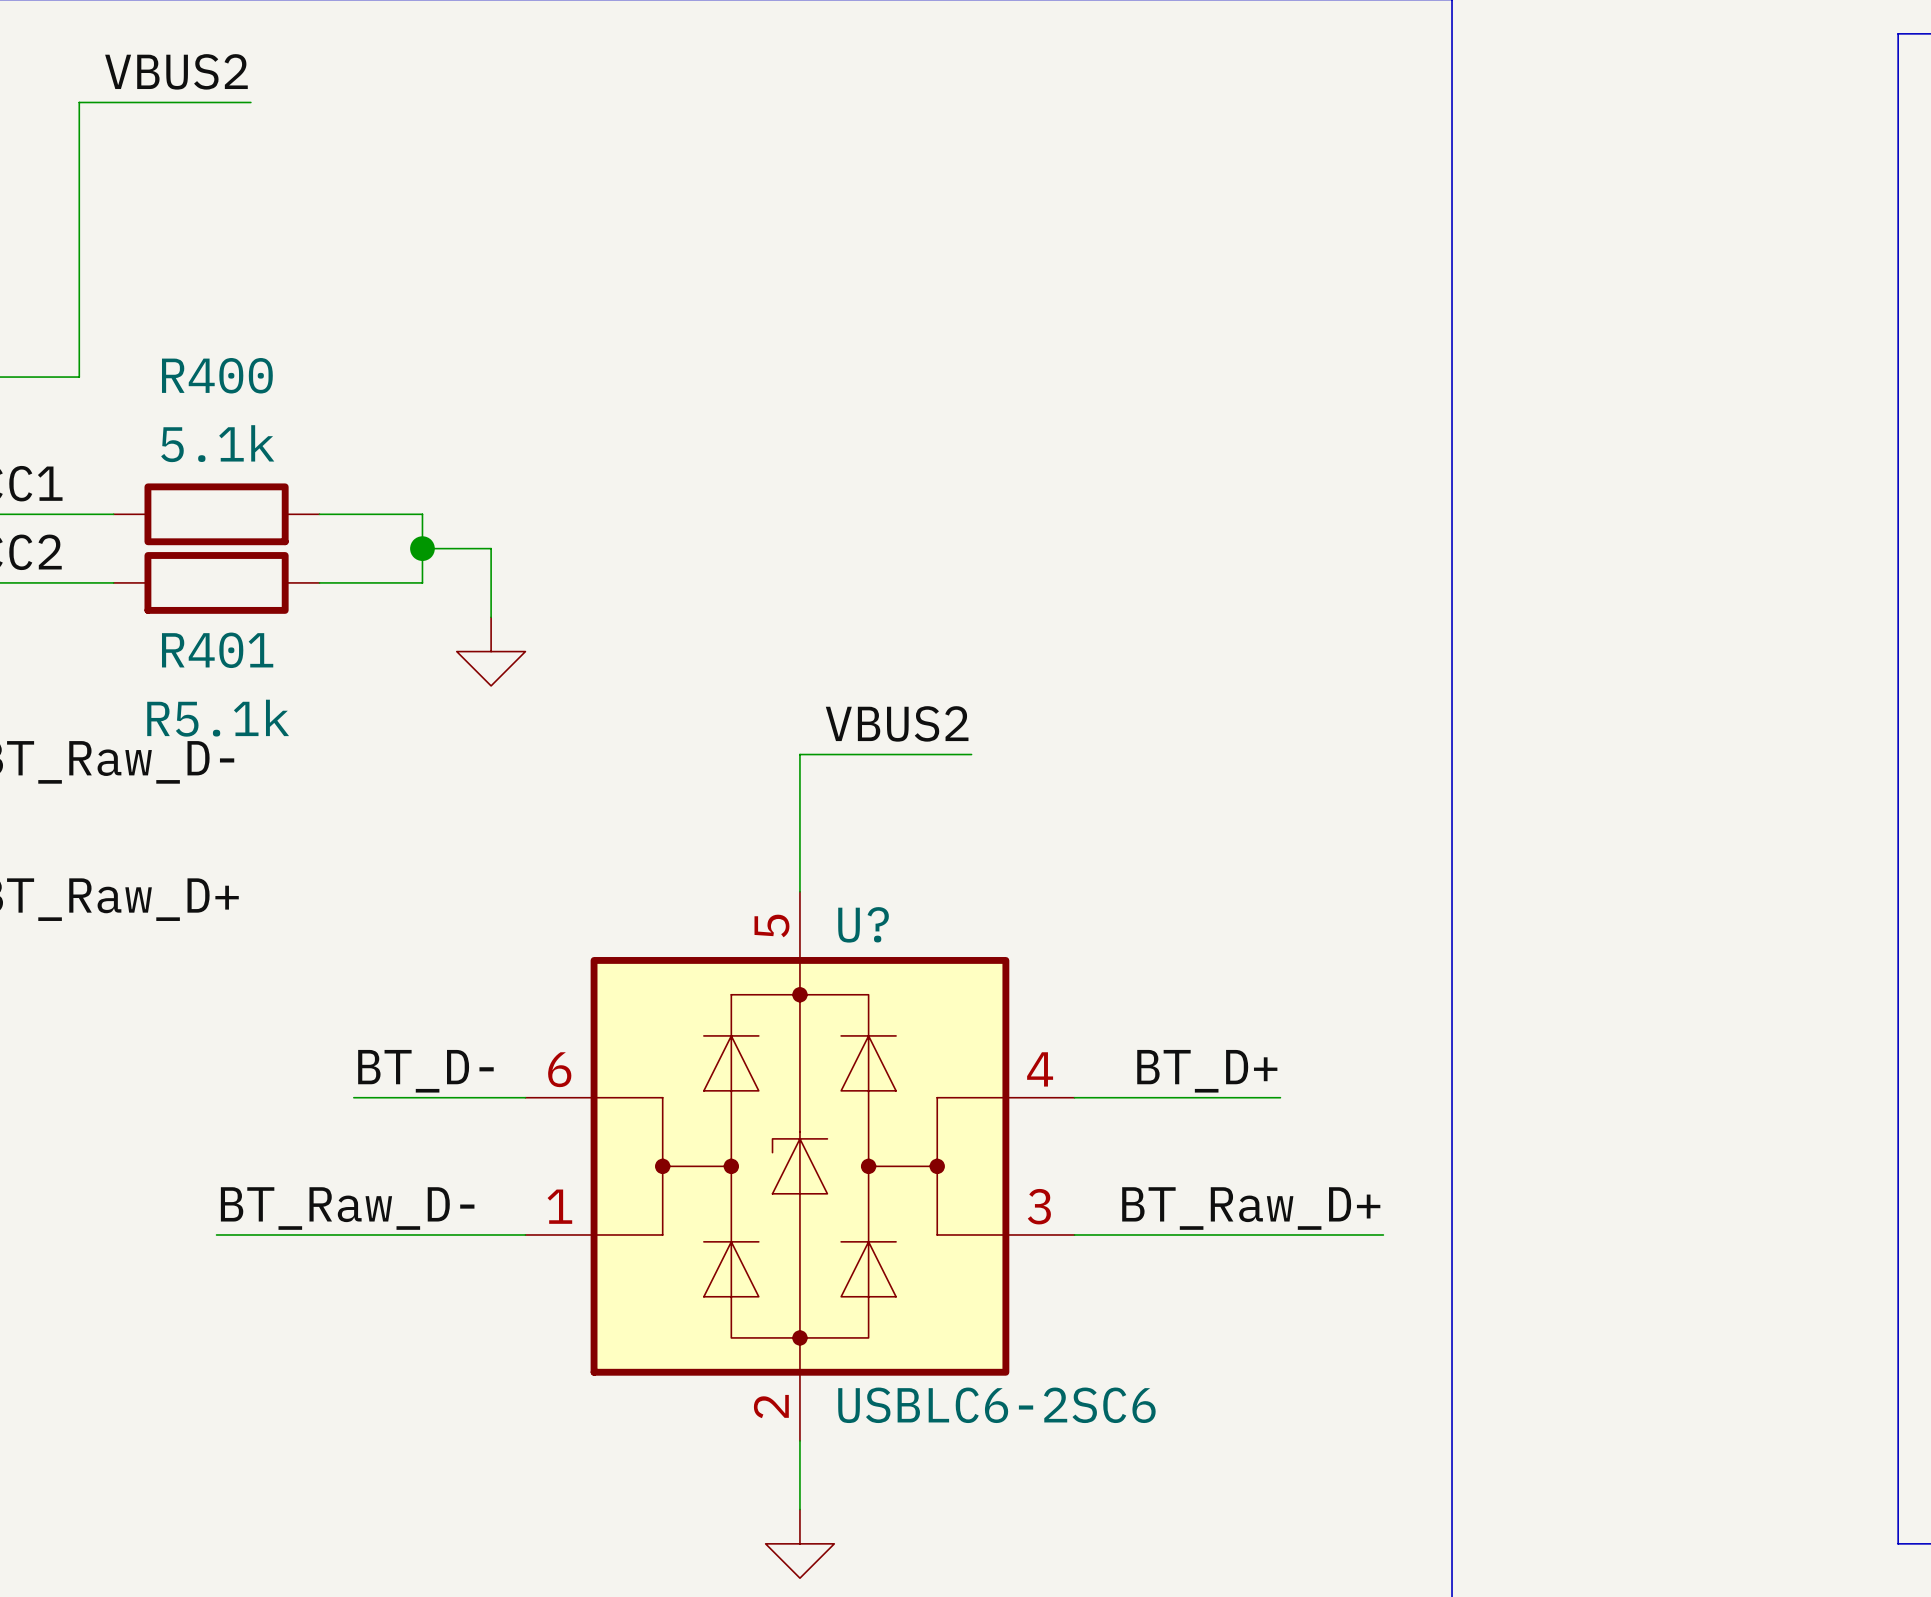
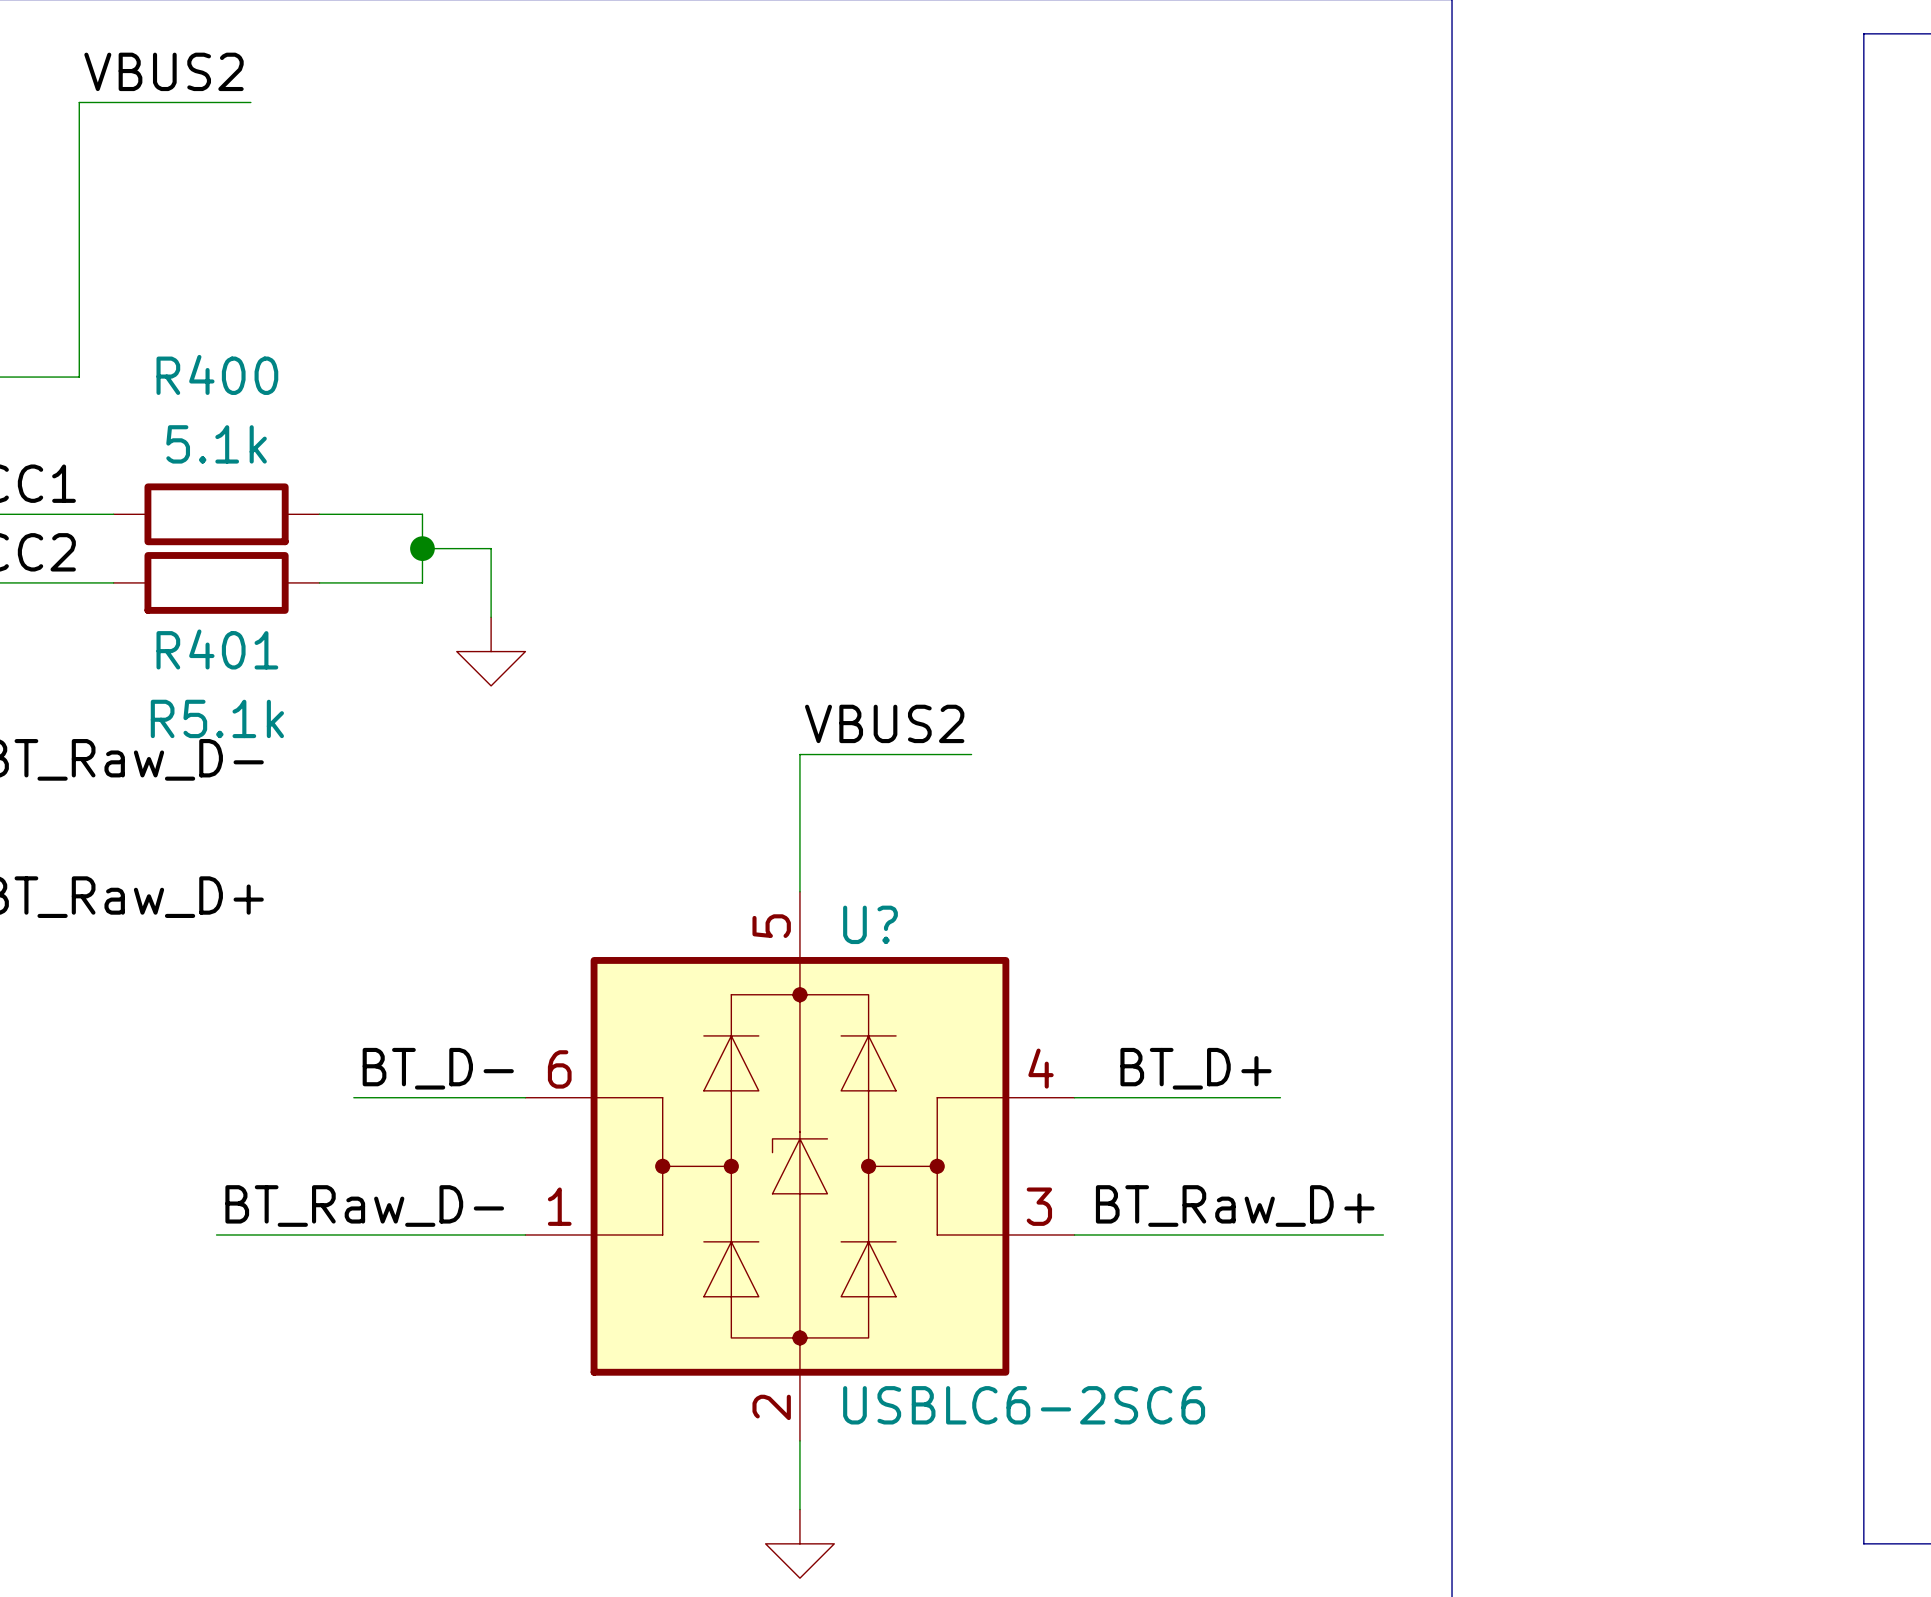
line: (1898, 33) (1898, 1543) -> (1898, 33) (1863, 33) (1863, 1543) (1898, 1543)

